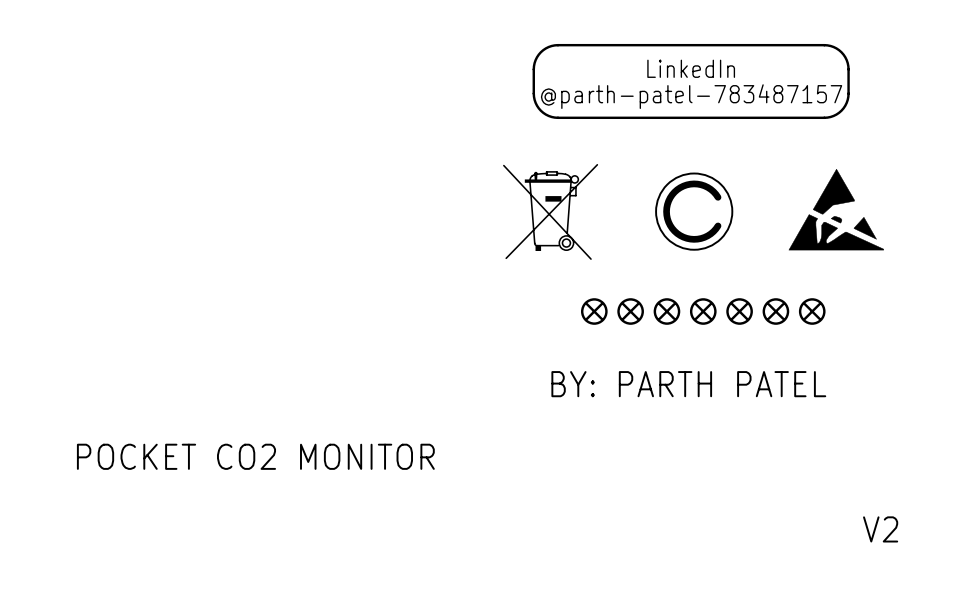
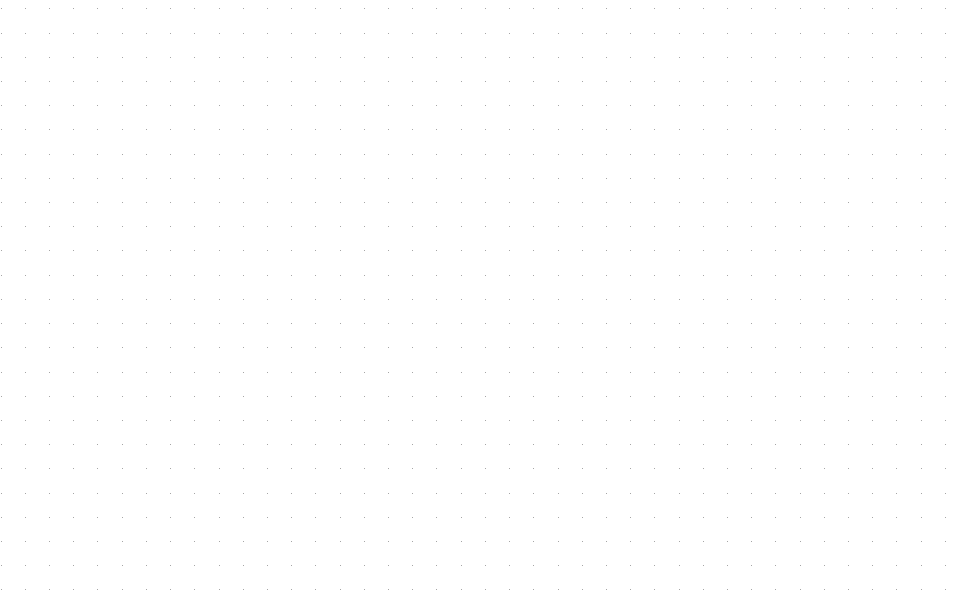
part: (691, 81) -> none
part: (836, 209) -> none
part: (550, 211) -> none
part: (694, 211) -> none
part: (594, 311) -> none
part: (630, 311) -> none
part: (666, 311) -> none
part: (703, 311) -> none
part: (739, 311) -> none
part: (775, 311) -> none
part: (812, 311) -> none
text: BY: PARTH PATEL (688, 384) -> none
text: POCKET CO2 MONITOR (255, 456) -> none
text: V2 (880, 529) -> none

